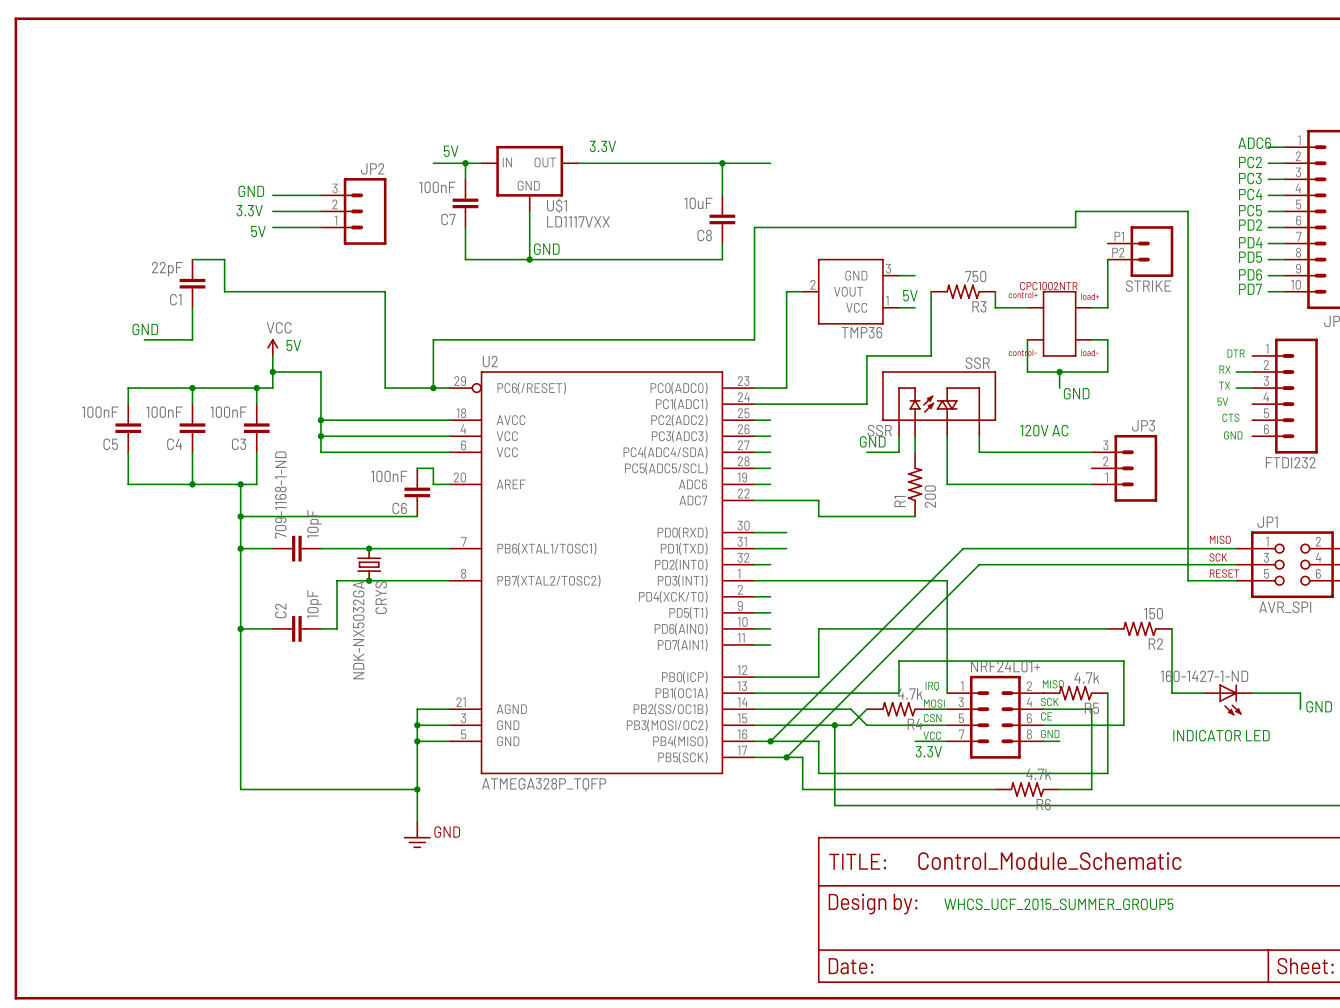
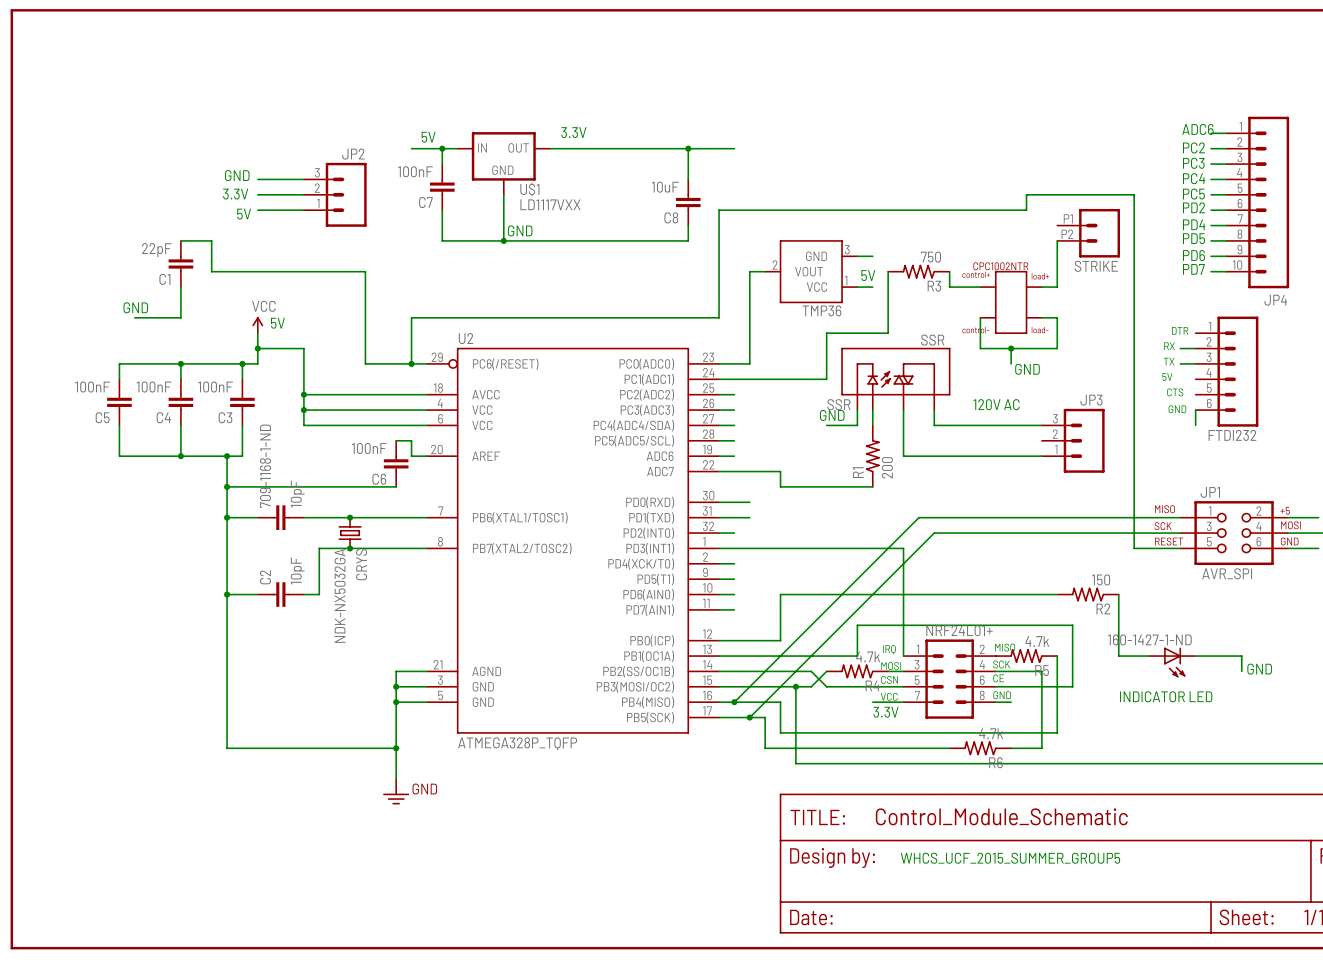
wire: none -> (1195, 410) (1195, 425)

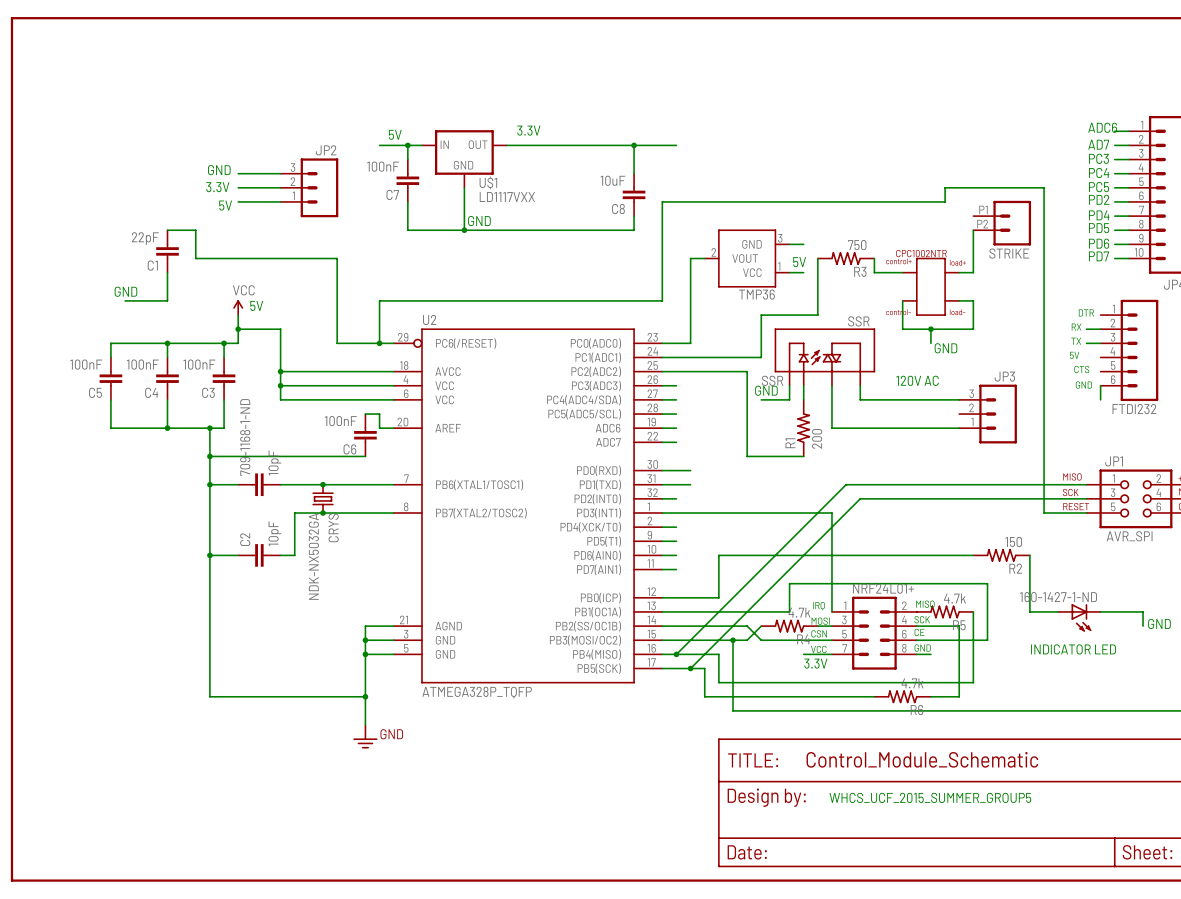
text: PC2 (1194, 147) -> AD7 (1098, 144)
wire: (734, 471) (780, 471) (780, 486) (811, 486) -> (676, 371) (747, 371) (747, 456)

